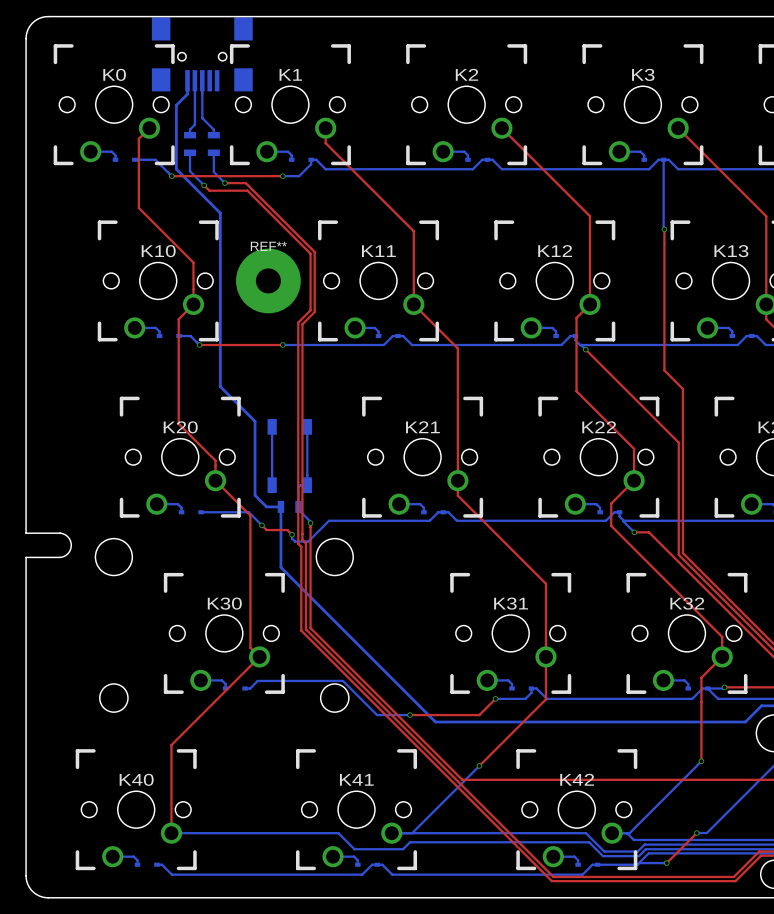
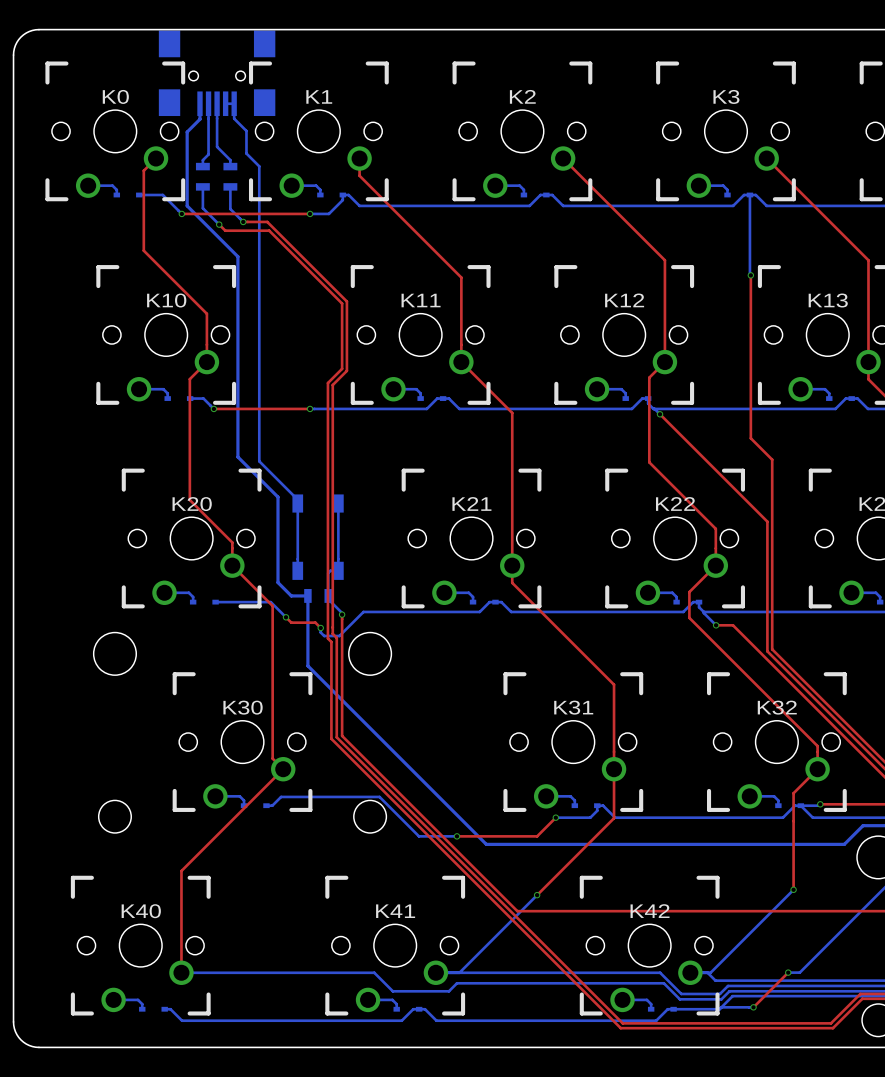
bottom track: none -> (225, 103) (234, 103) (234, 118) (246, 130) (246, 153) (259, 166) (259, 461) (297, 499) (297, 503)
REF**: (268, 280) -> none
board edge: (26, 533) (60, 533) (65, 535) (70, 540) (70, 548) (66, 554) (60, 557) -> (13, 626) (13, 654)
board edge: (26, 557) (60, 557) -> none

